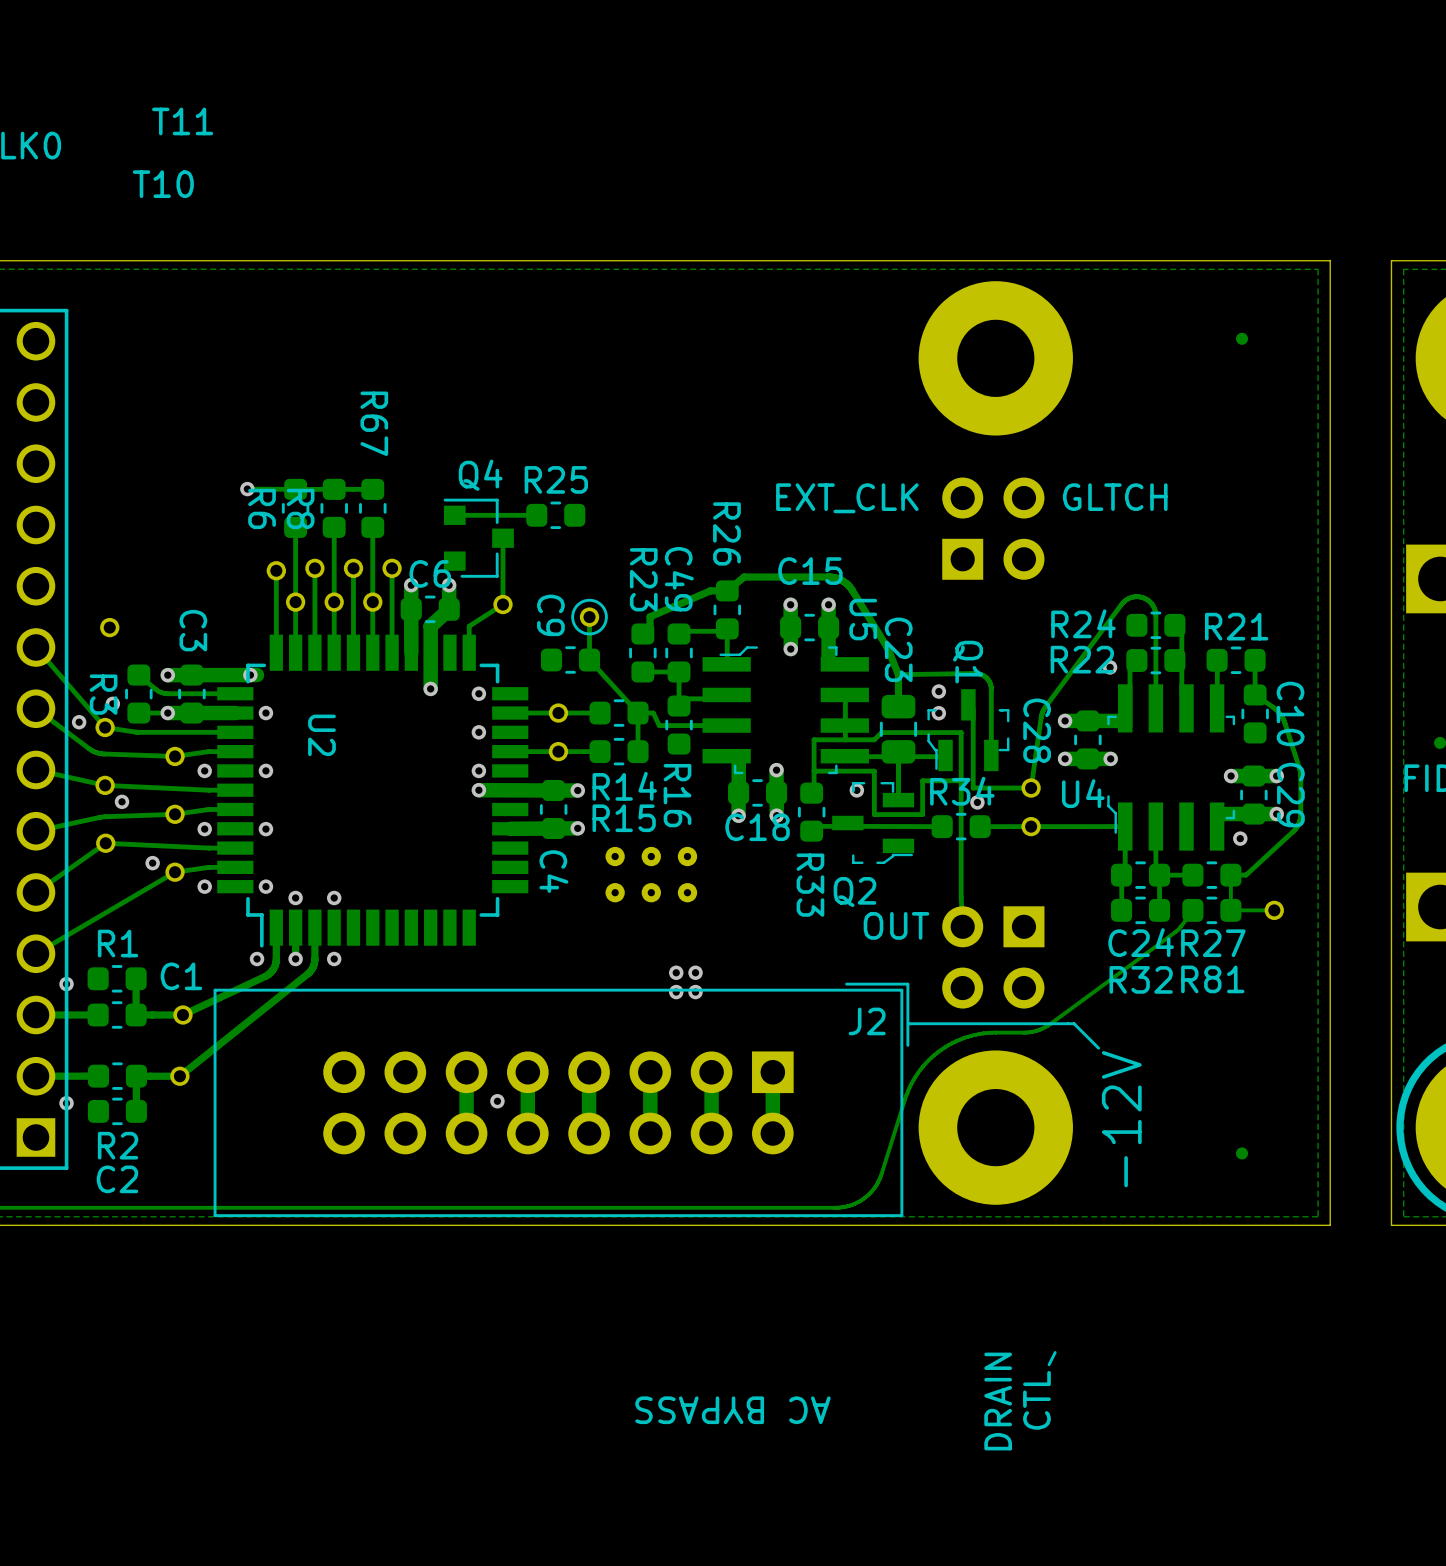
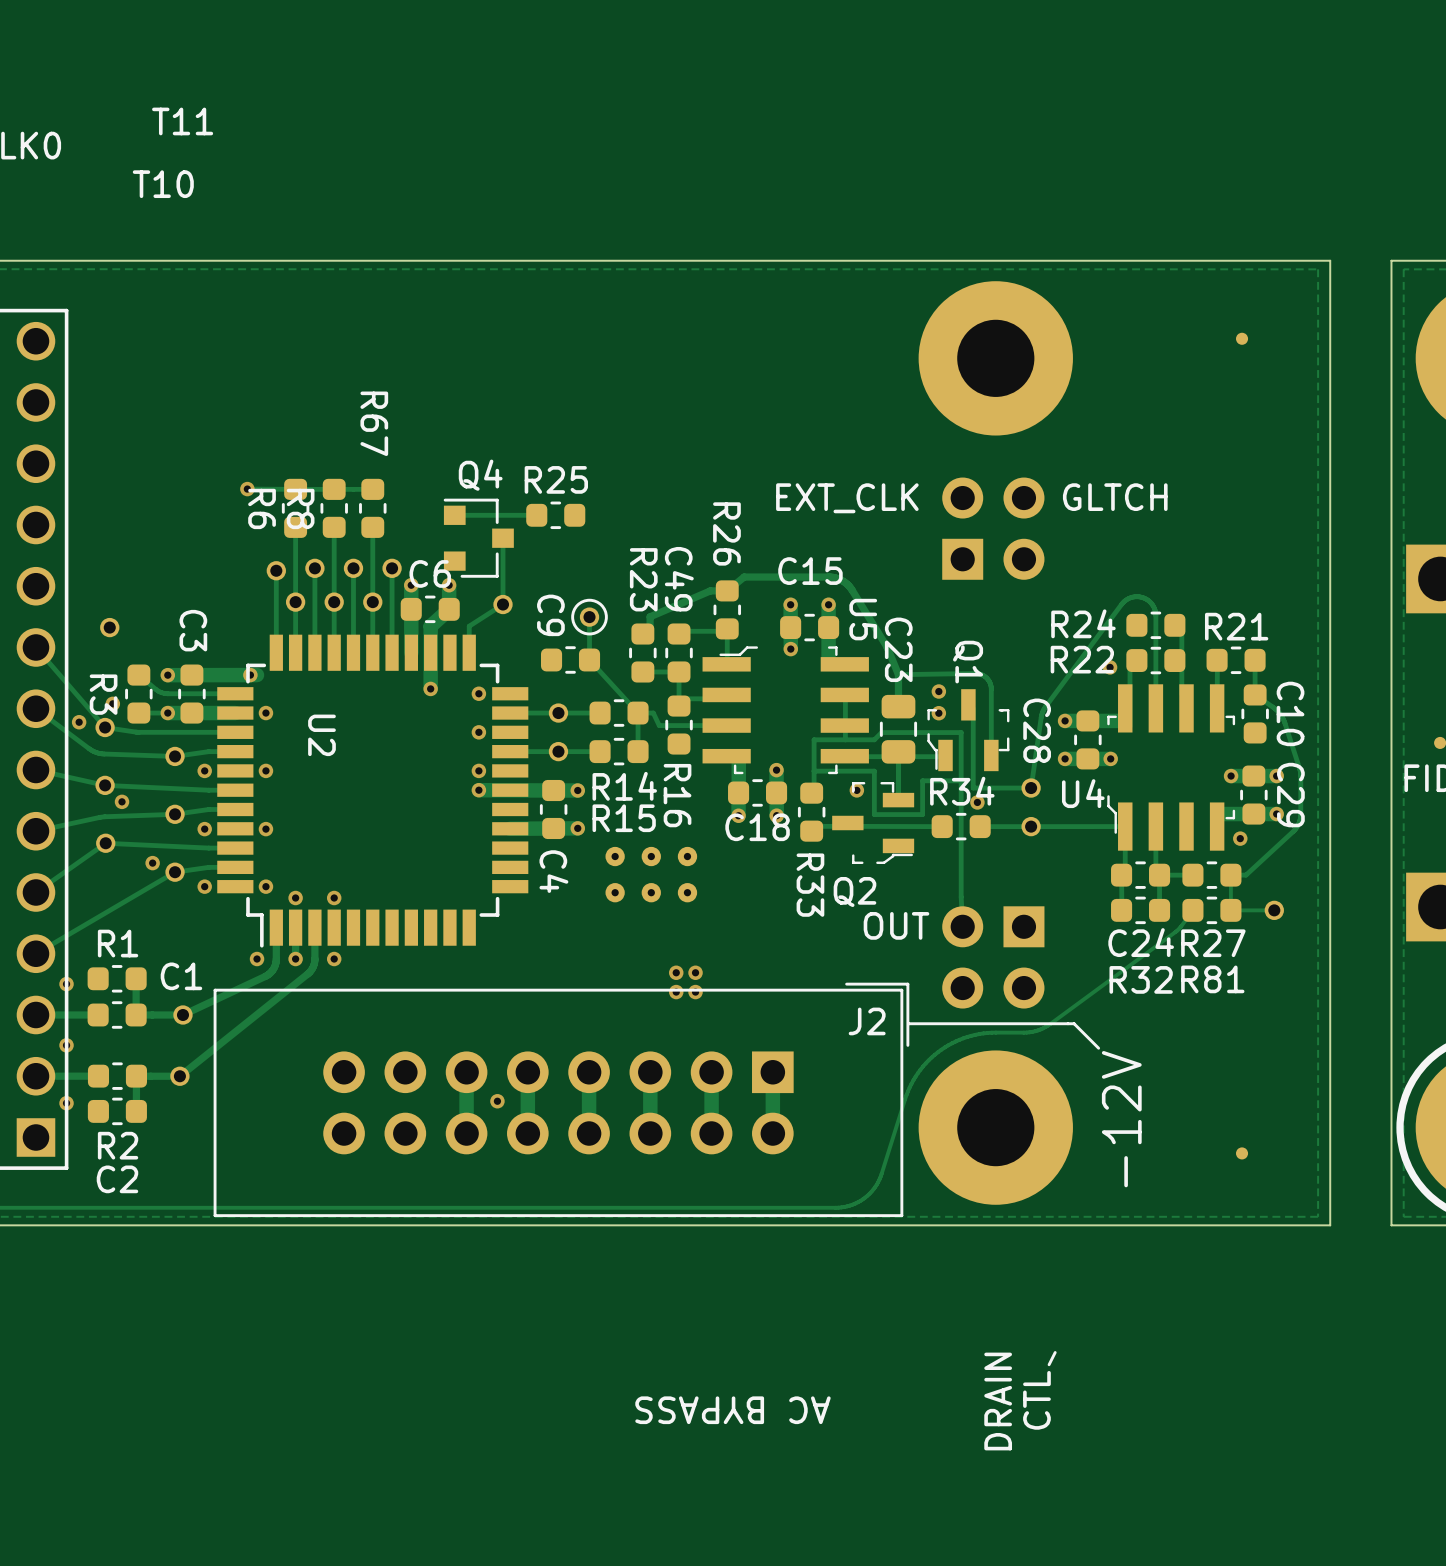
via: none -> (66, 1045)

